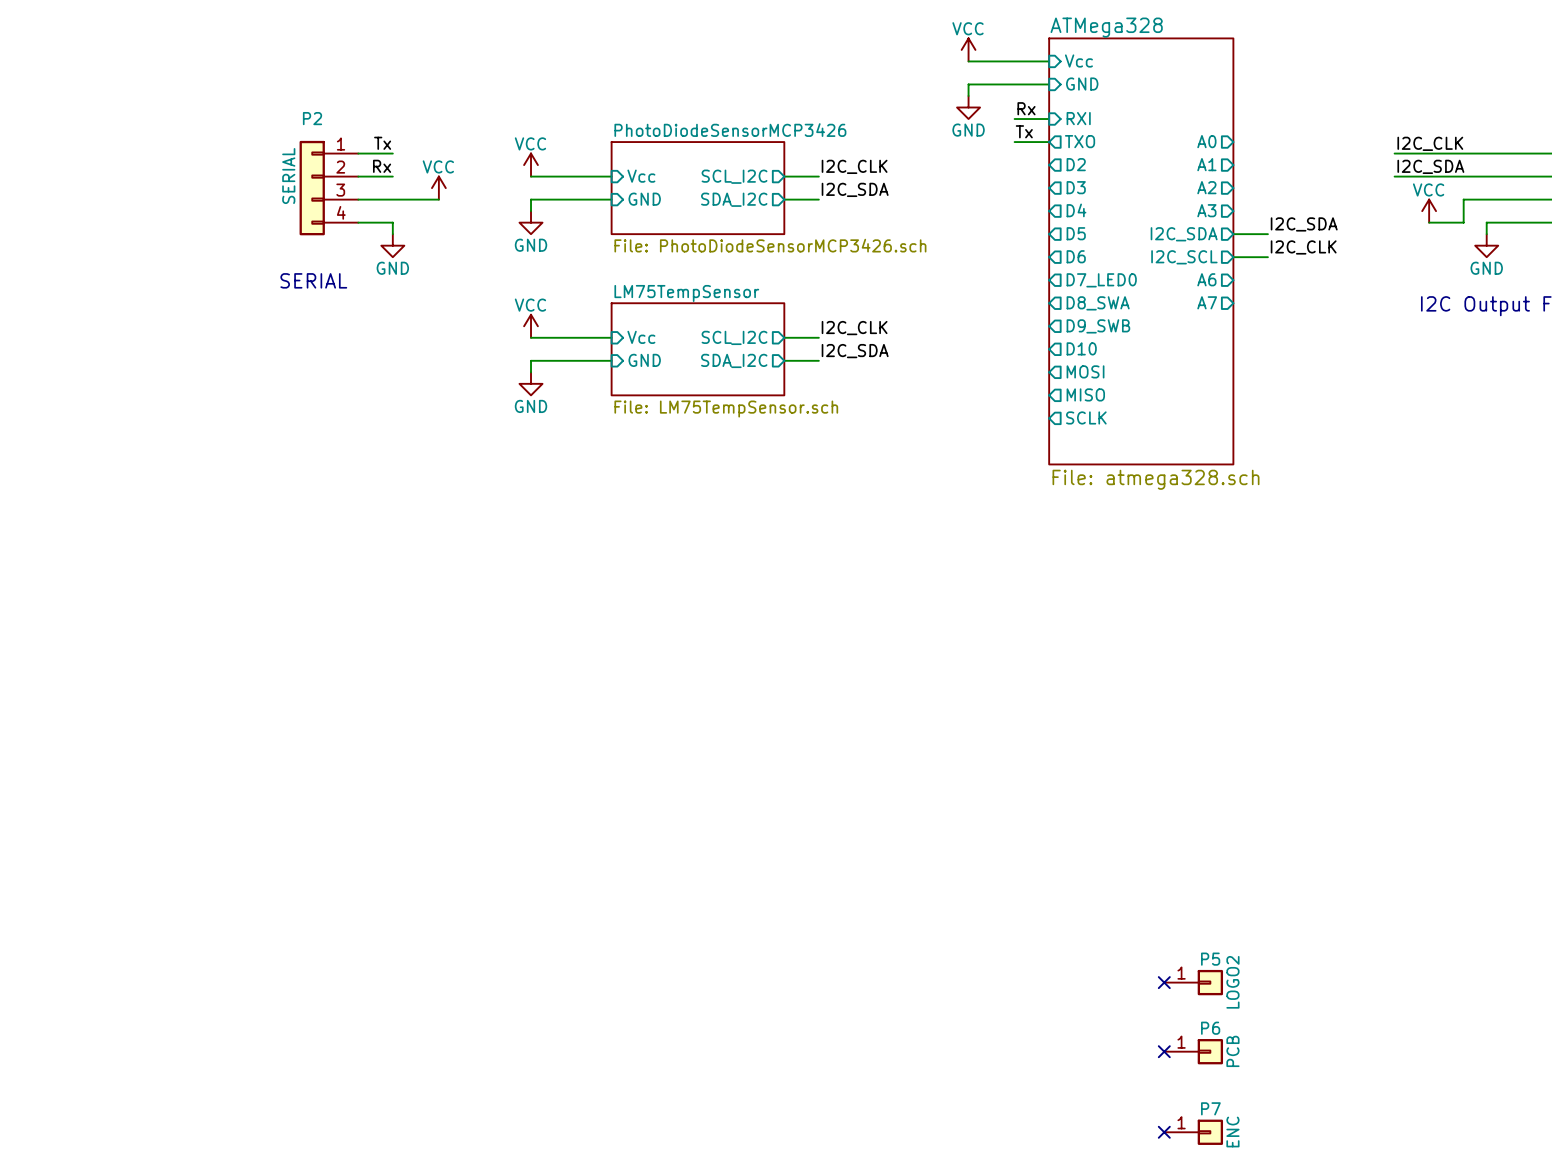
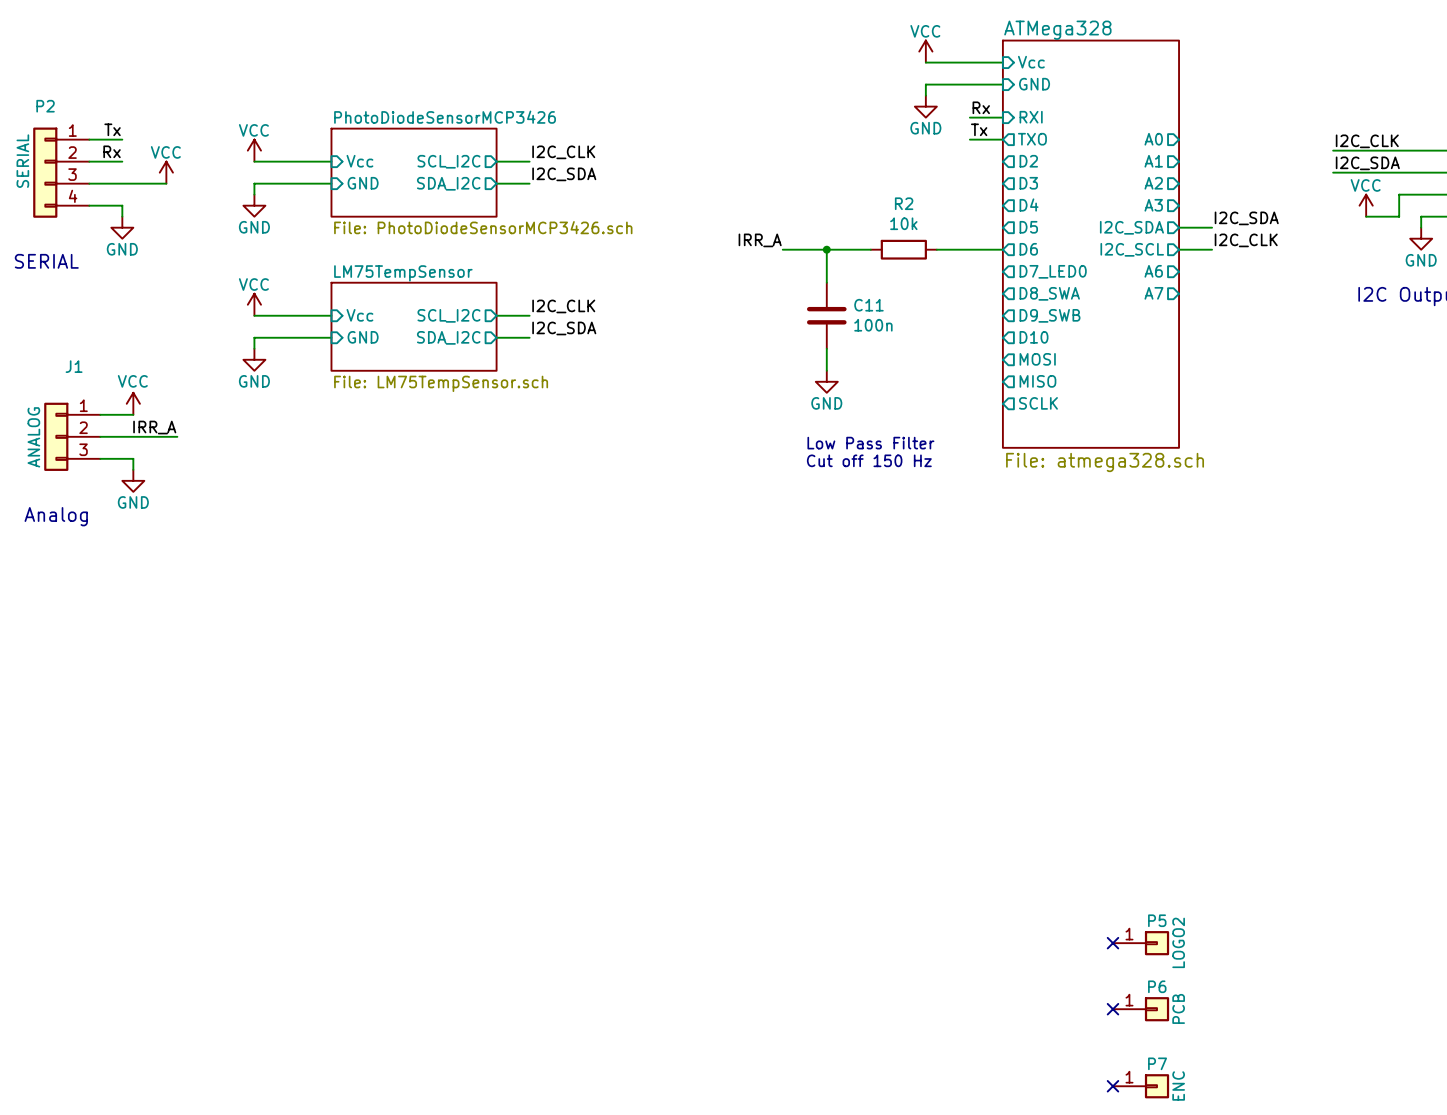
label: none -> Tx (112, 129)
wire: none -> (89, 139) (122, 139)
label: Tx (382, 143) -> none
power symbol: none -> VCC (254, 150)
wire: (358, 153) (392, 153) -> (496, 161) (529, 161)
label: none -> Rx (112, 151)
label: none -> I2C_CLK (563, 152)
sheet pin: none -> Vcc (359, 161)
wire: none -> (89, 161) (122, 161)
sheet pin: none -> SCL_I2C (448, 161)
power symbol: VCC (531, 165) -> none
label: Rx (382, 166) -> none
label: I2C_CLK (854, 166) -> none
power symbol: none -> VCC (166, 172)
wire: (358, 176) (392, 176) -> (496, 183) (529, 183)
wire: (531, 176) (611, 176) -> none
sheet pin: Vcc (641, 176) -> none
sheet pin: SCL_I2C (734, 176) -> none
wire: (784, 176) (818, 176) -> none
label: none -> I2C_SDA (564, 174)
sheet pin: none -> GND (363, 183)
wire: none -> (89, 183) (166, 183)
P2 position: (328, 188) -> (61, 172)
wire: none -> (331, 183) (254, 183) (254, 194)
power symbol: VCC (438, 188) -> none
sheet pin: none -> SDA_I2C (448, 183)
sheet PhotoDiodeSensorMCP3426 position: (697, 188) -> (414, 172)
label: I2C_SDA (855, 189) -> none
wire: (358, 199) (438, 199) -> (254, 161) (331, 161)
wire: (611, 199) (531, 199) (531, 211) -> none
sheet pin: GND (644, 199) -> none
sheet pin: SDA_I2C (734, 199) -> none
wire: (784, 199) (818, 199) -> none
wire: none -> (89, 205) (122, 205) (122, 216)
power symbol: none -> GND (254, 205)
power symbol: GND (531, 222) -> none
power symbol: none -> GND (122, 227)
power symbol: GND (392, 245) -> none
label: none -> IRR_A (760, 240)
wire: none -> (782, 249) (870, 249)
wire: none -> (826, 249) (826, 282)
junction: none -> (826, 249)
R2: none -> 10k (903, 249)
wire: none -> (936, 249) (1002, 249)
text: none -> SERIAL (46, 261)
text: SERIAL (313, 280) -> none
power symbol: none -> VCC (254, 304)
label: none -> I2C_CLK (563, 306)
sheet pin: none -> Vcc (359, 315)
wire: none -> (254, 315) (331, 315)
sheet pin: none -> SCL_I2C (448, 315)
wire: none -> (496, 315) (529, 315)
power symbol: VCC (531, 326) -> none
C11: none -> 100n (826, 315)
label: I2C_CLK (854, 328) -> none
wire: (531, 337) (611, 337) -> none
sheet pin: Vcc (641, 337) -> none
sheet pin: SCL_I2C (734, 337) -> none
wire: (784, 337) (818, 337) -> none
label: none -> I2C_SDA (564, 328)
sheet pin: none -> GND (363, 337)
wire: none -> (331, 337) (254, 337) (254, 348)
sheet pin: none -> SDA_I2C (448, 337)
wire: none -> (496, 337) (529, 337)
sheet LM75TempSensor position: (697, 349) -> (414, 326)
label: I2C_SDA (855, 351) -> none
wire: (611, 360) (531, 360) (531, 372) -> none
sheet pin: GND (644, 360) -> none
sheet pin: SDA_I2C (734, 360) -> none
wire: (784, 360) (818, 360) -> none
wire: none -> (826, 348) (826, 370)
power symbol: none -> GND (254, 359)
power symbol: GND (531, 383) -> none
power symbol: none -> GND (826, 381)
power symbol: none -> VCC (133, 403)
wire: none -> (100, 414) (133, 414)
label: none -> IRR_A (154, 427)
J1: none -> ANALOG (72, 436)
wire: none -> (100, 436) (177, 436)
text: none -> Low Pass Filter (870, 443)
wire: none -> (100, 458) (133, 458) (133, 469)
text: none -> Cut off 150 Hz (869, 460)
power symbol: none -> GND (133, 480)
text: none -> Analog (56, 516)

